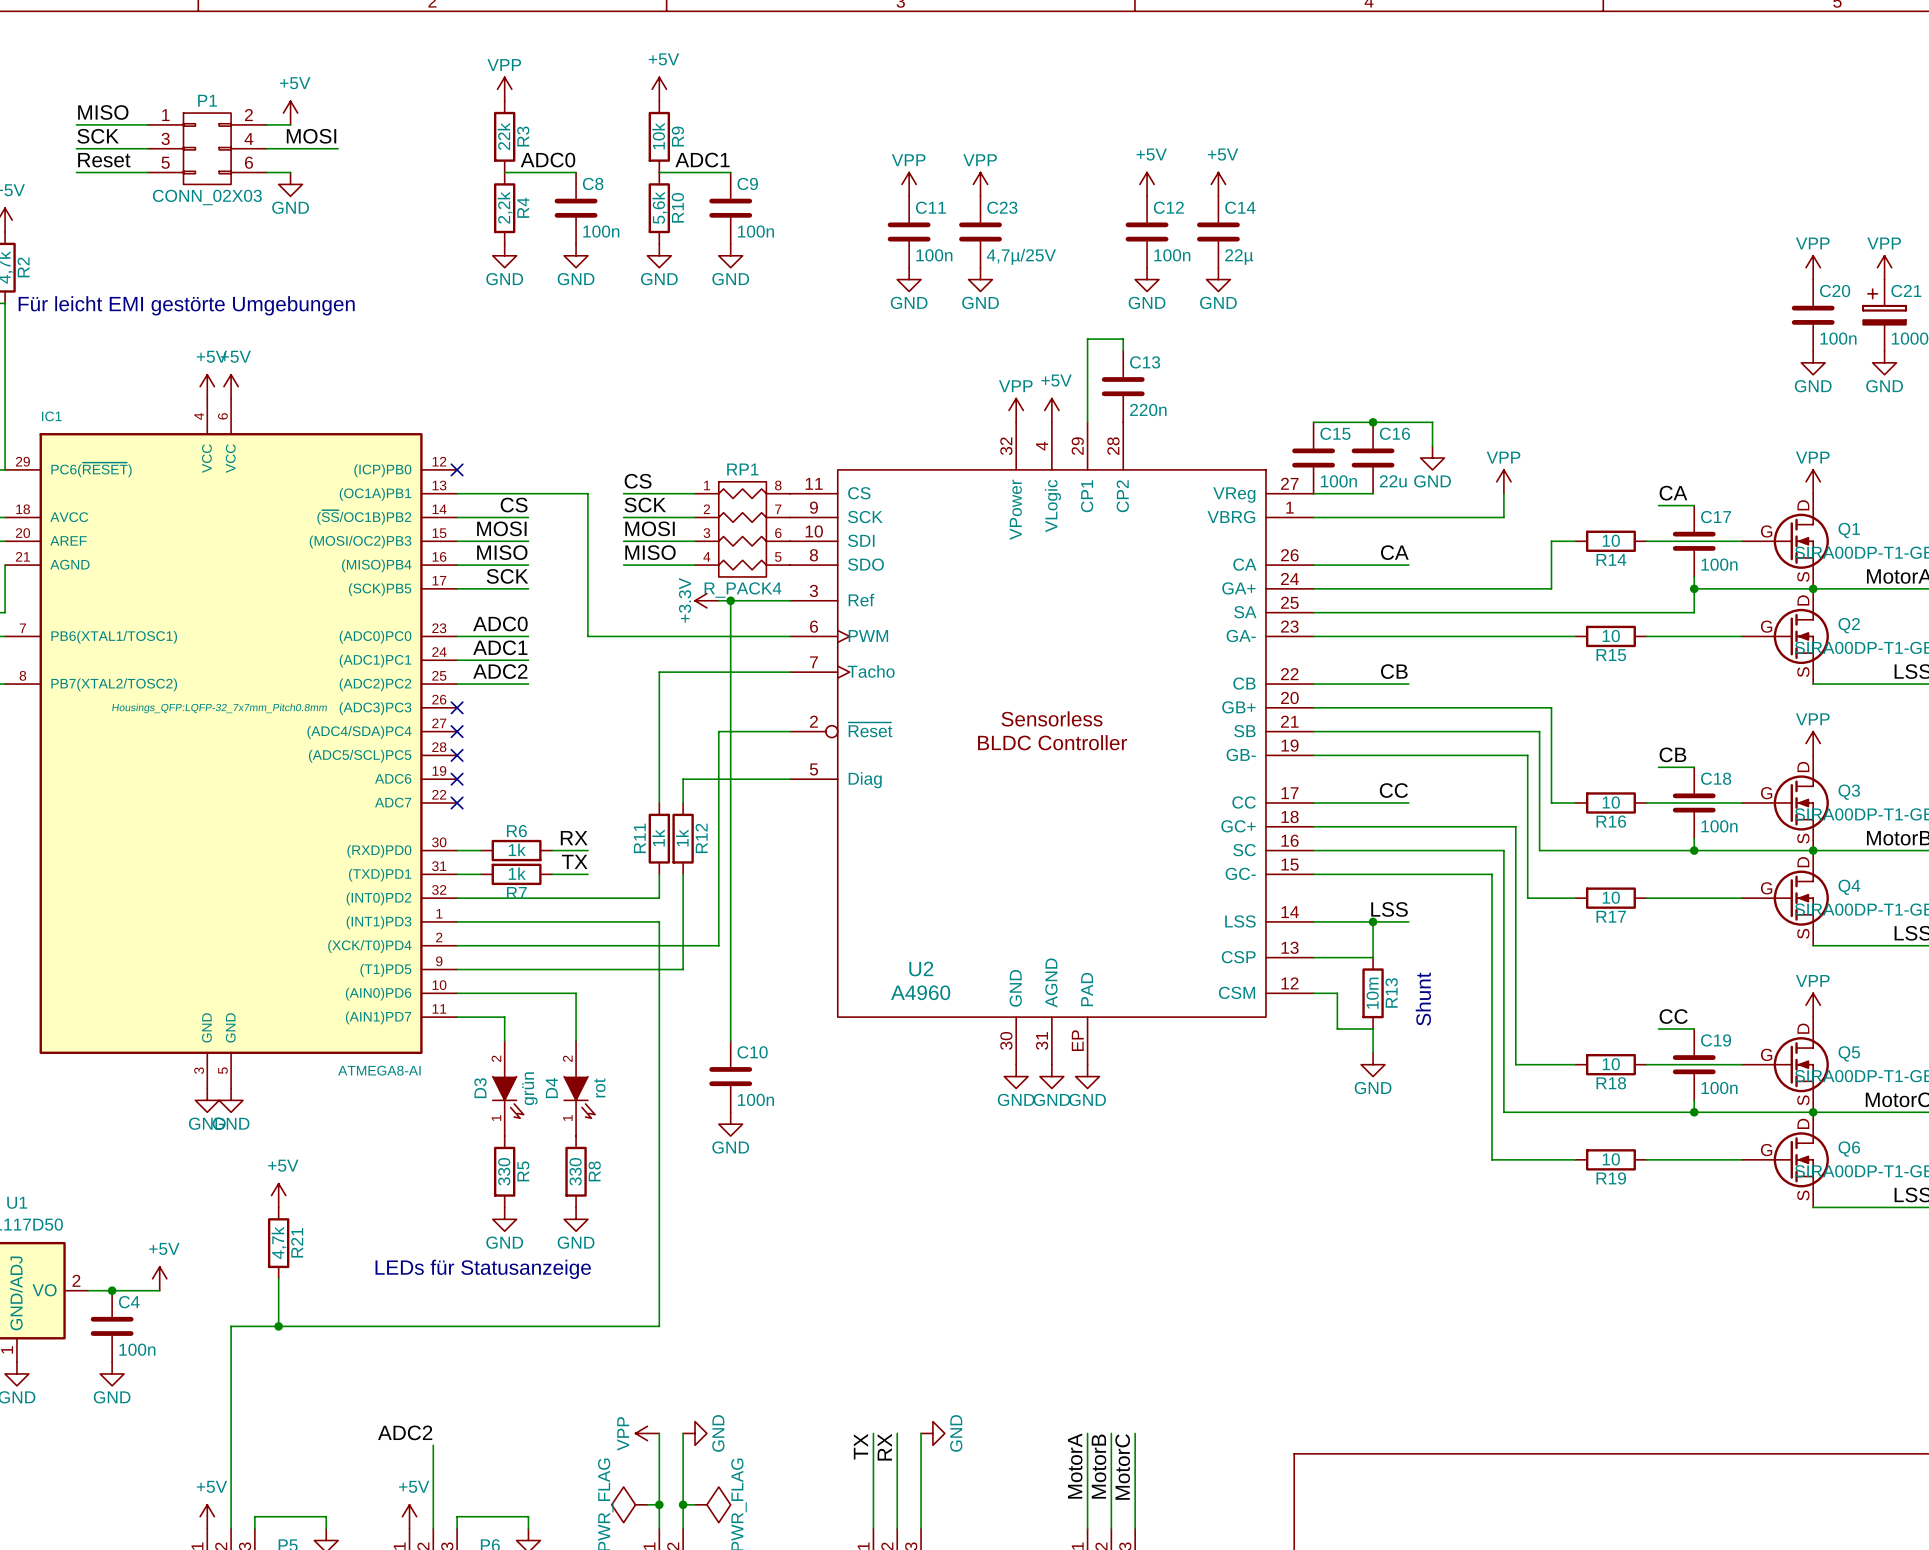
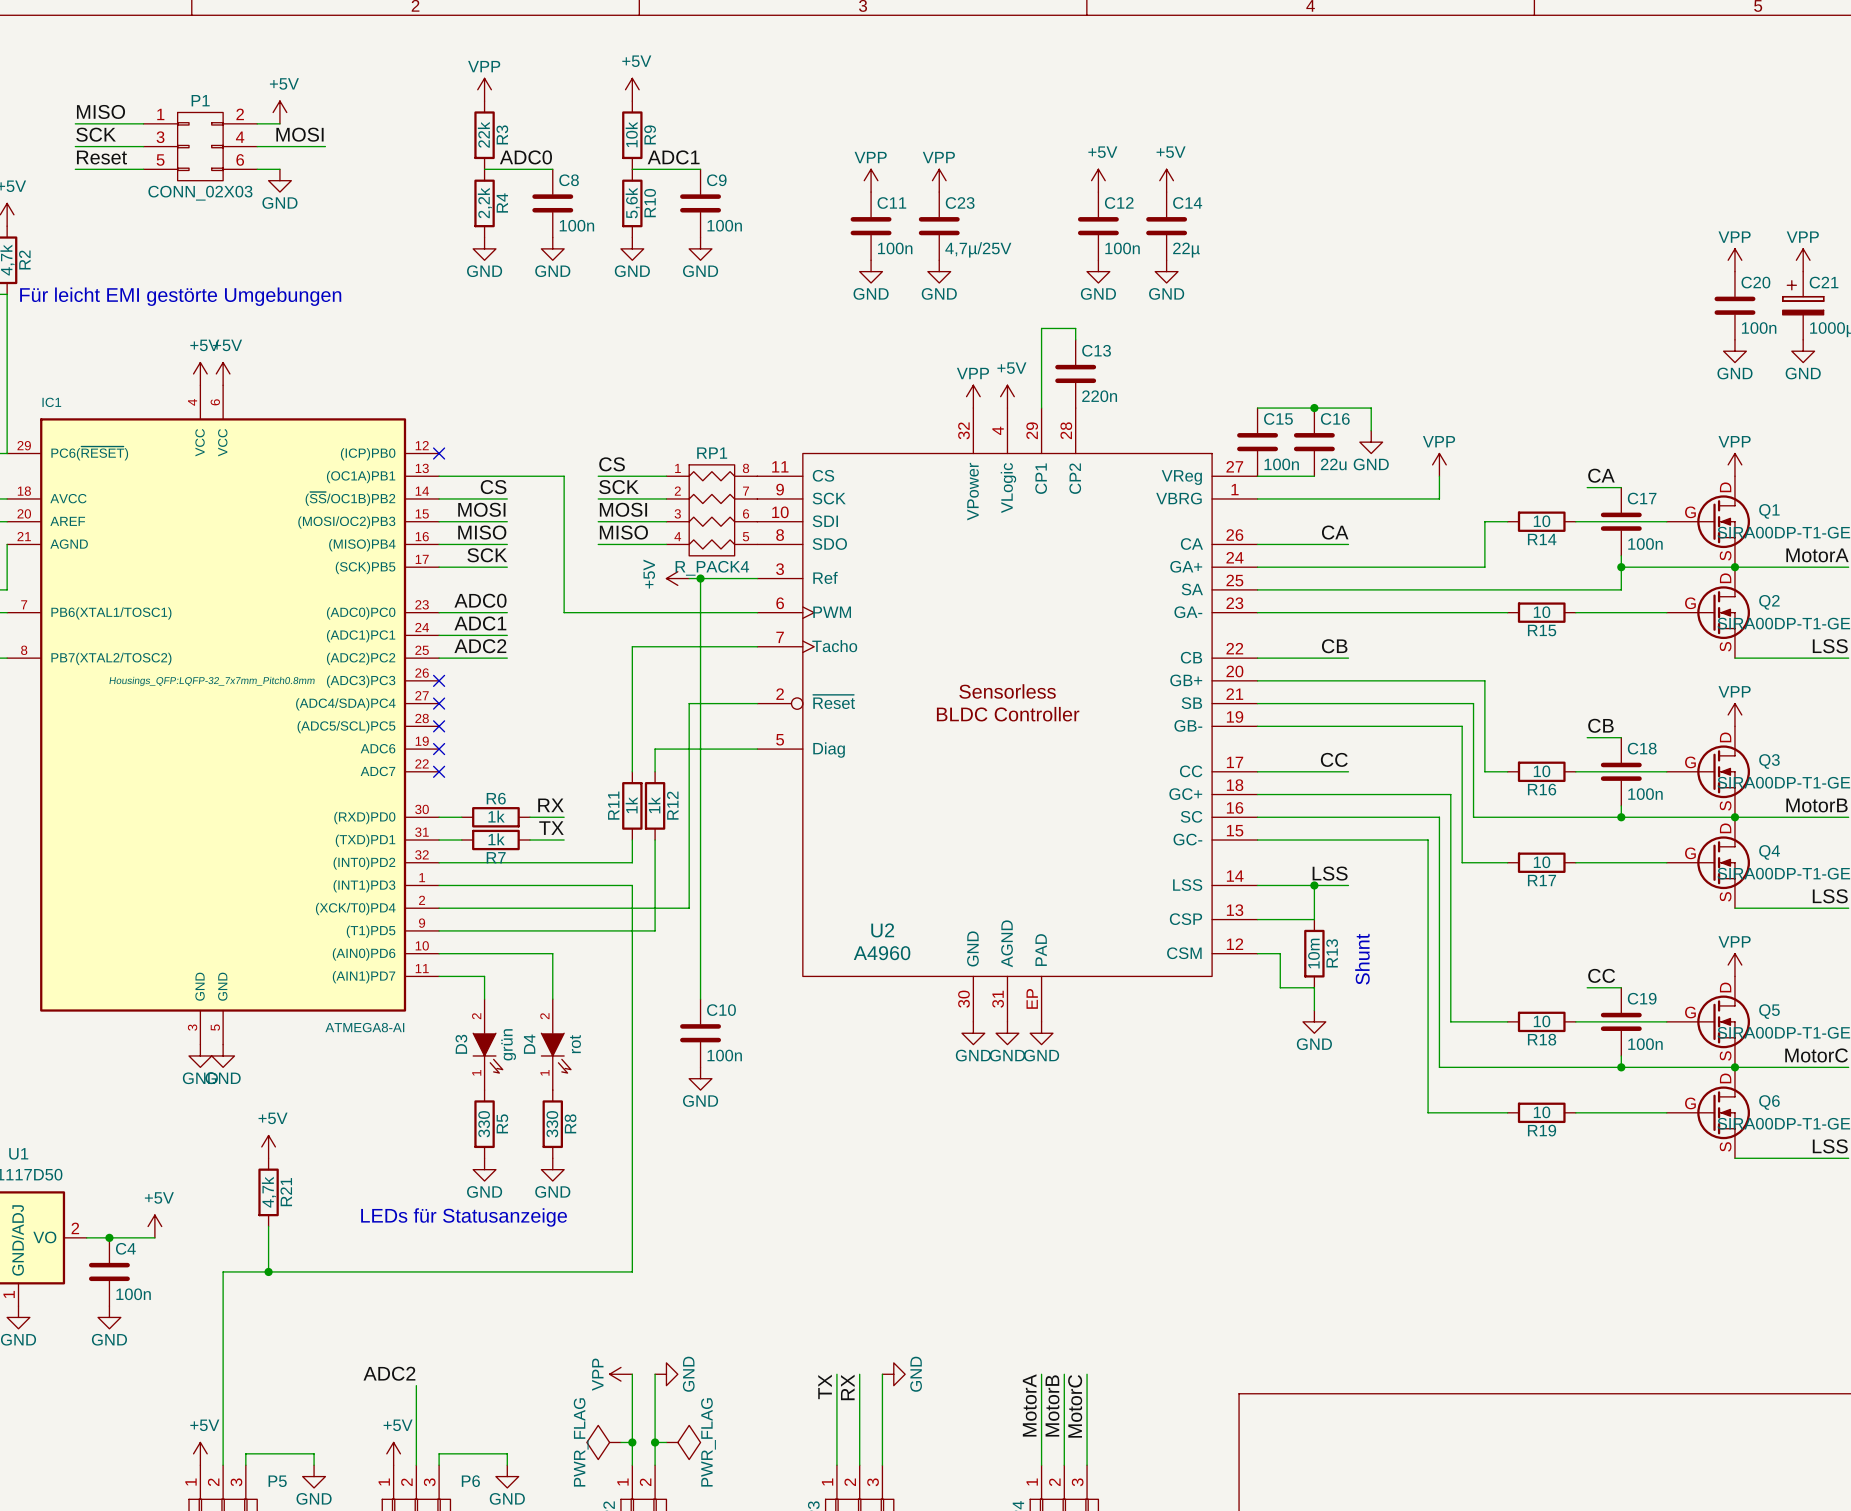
power symbol: +3.3V (706, 600) -> +5V (677, 578)

